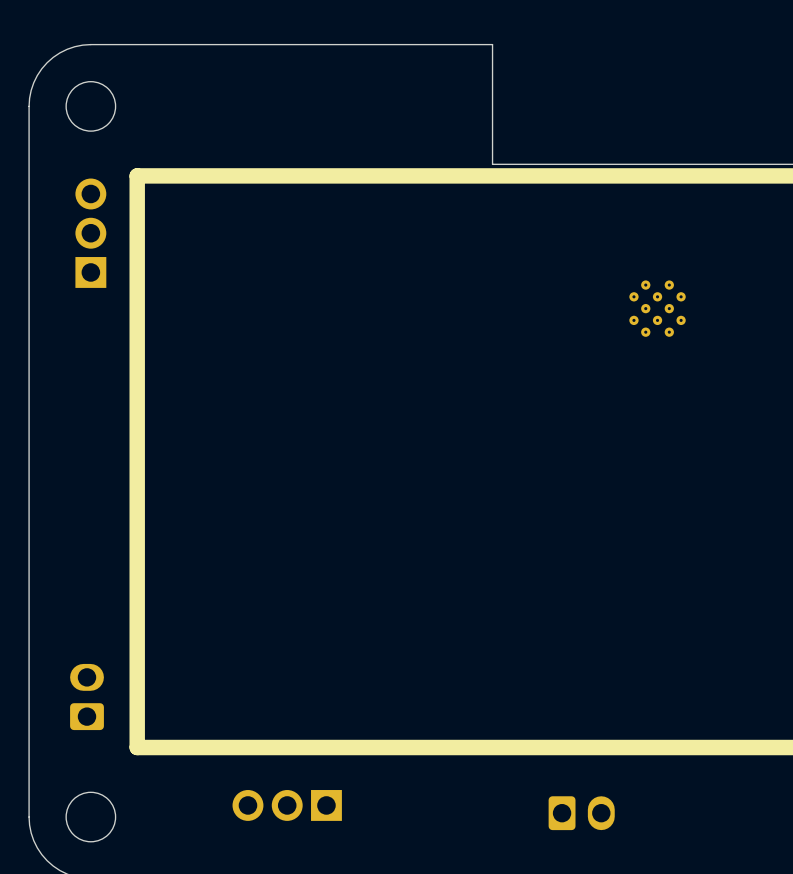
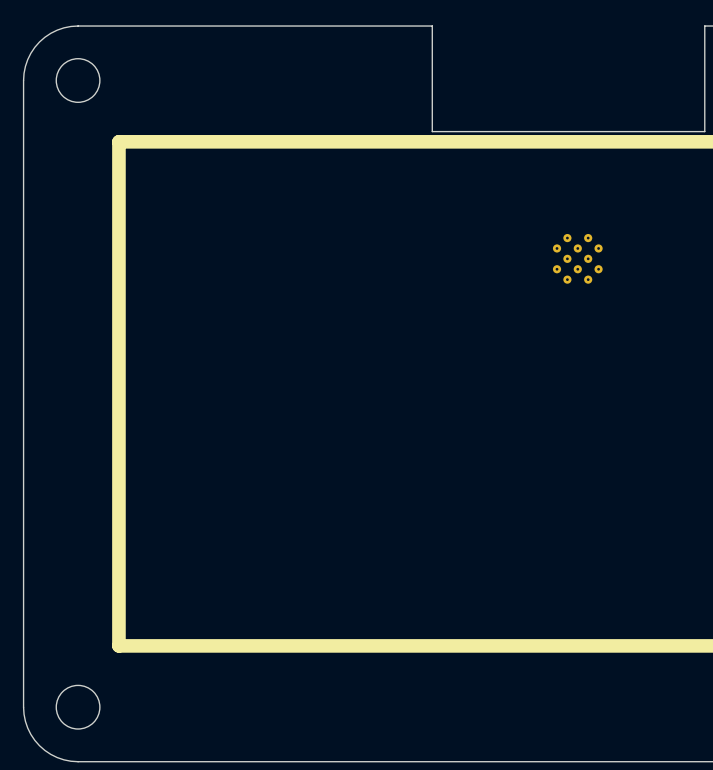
part: (90, 233) -> none
part: (87, 697) -> none
part: (287, 805) -> none
part: (581, 813) -> none

